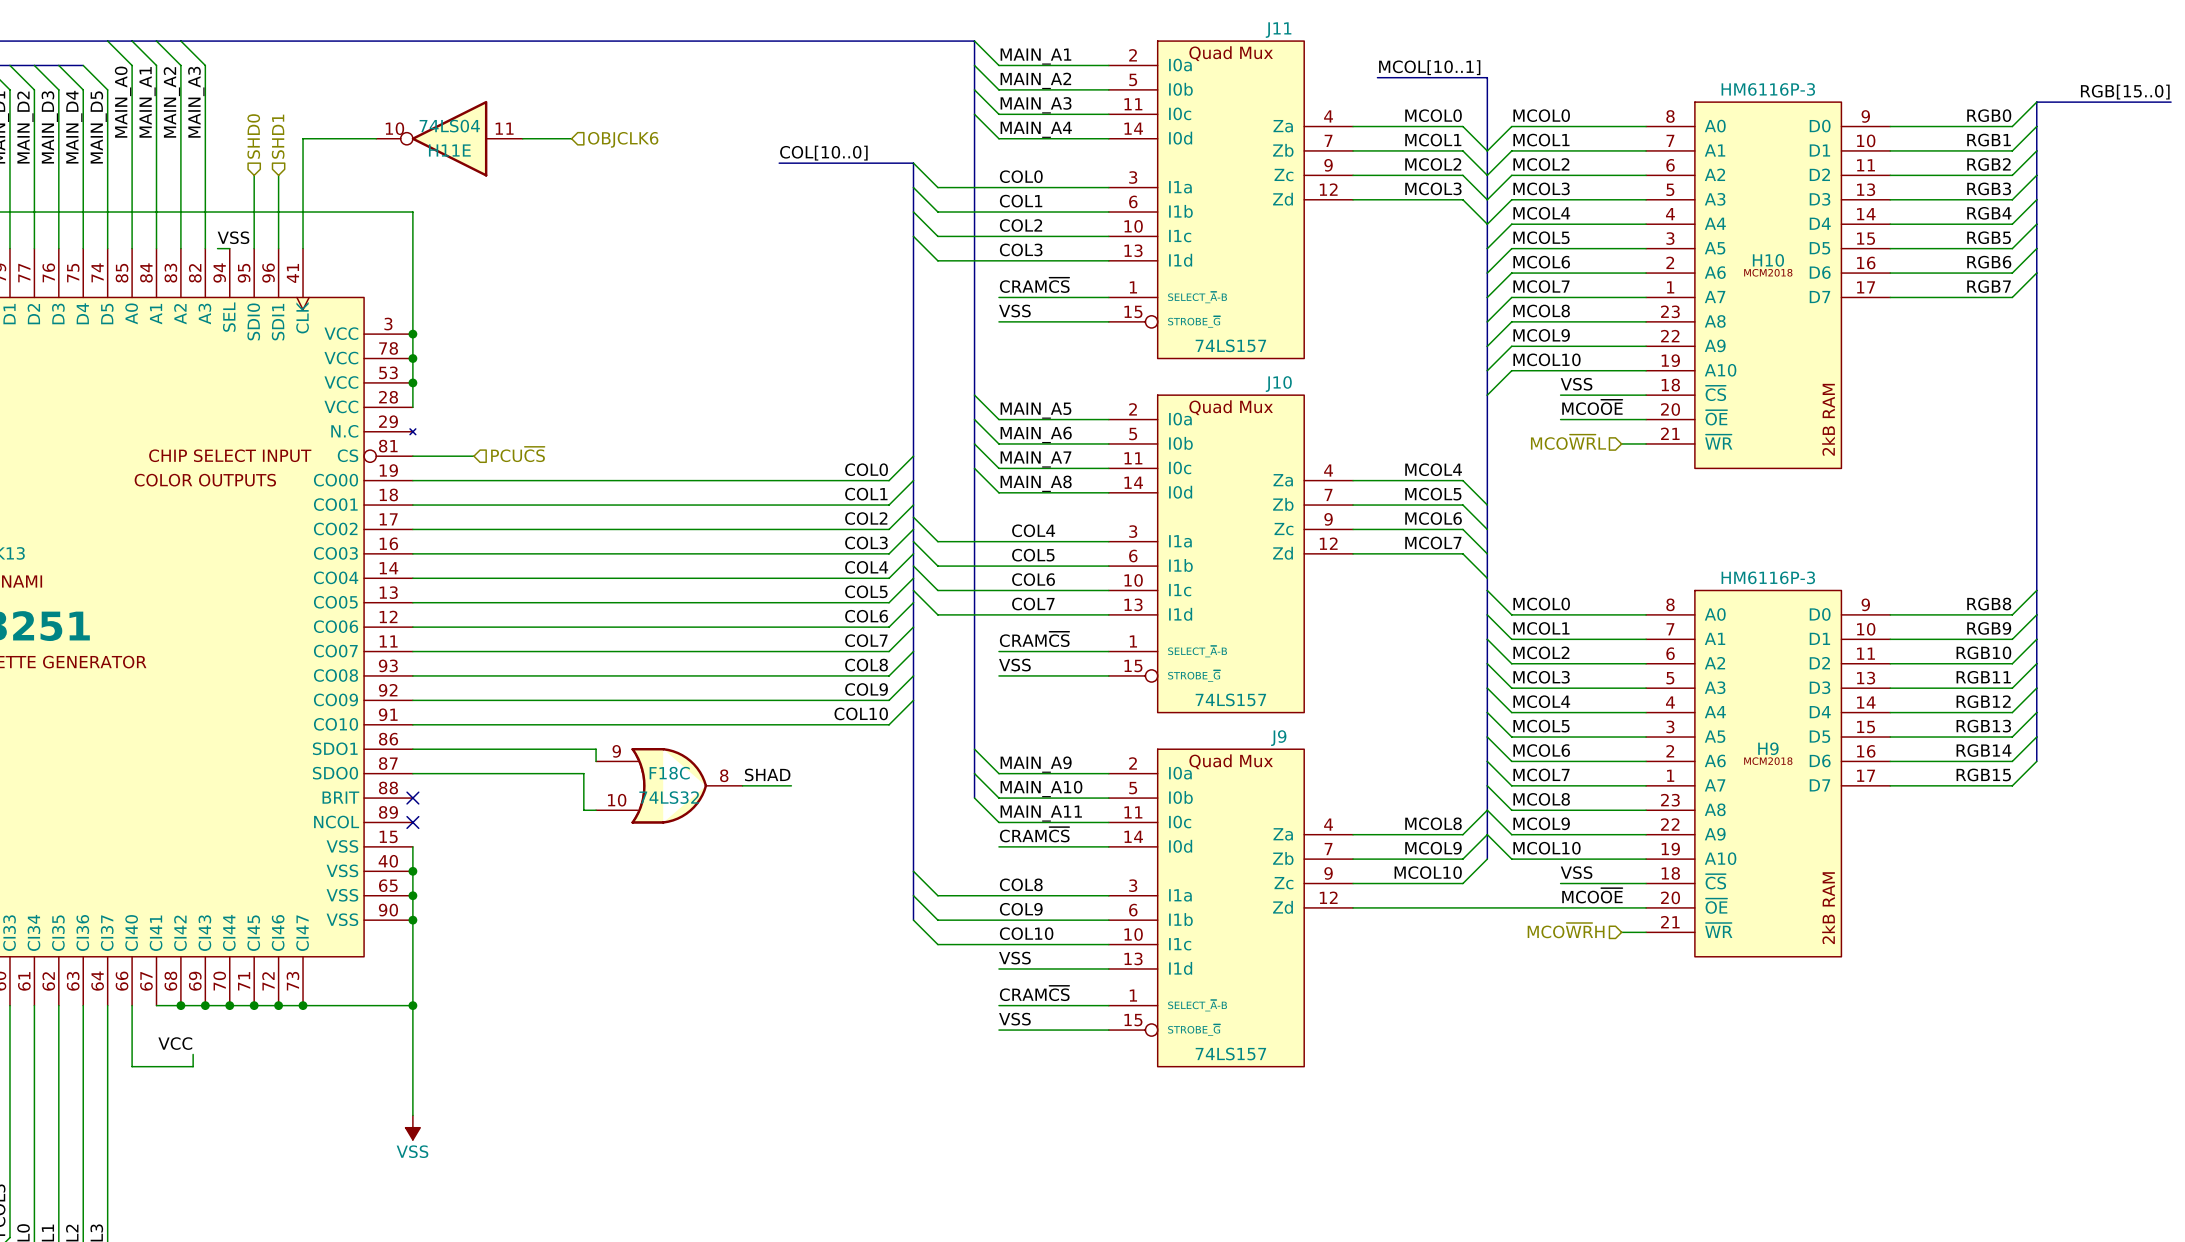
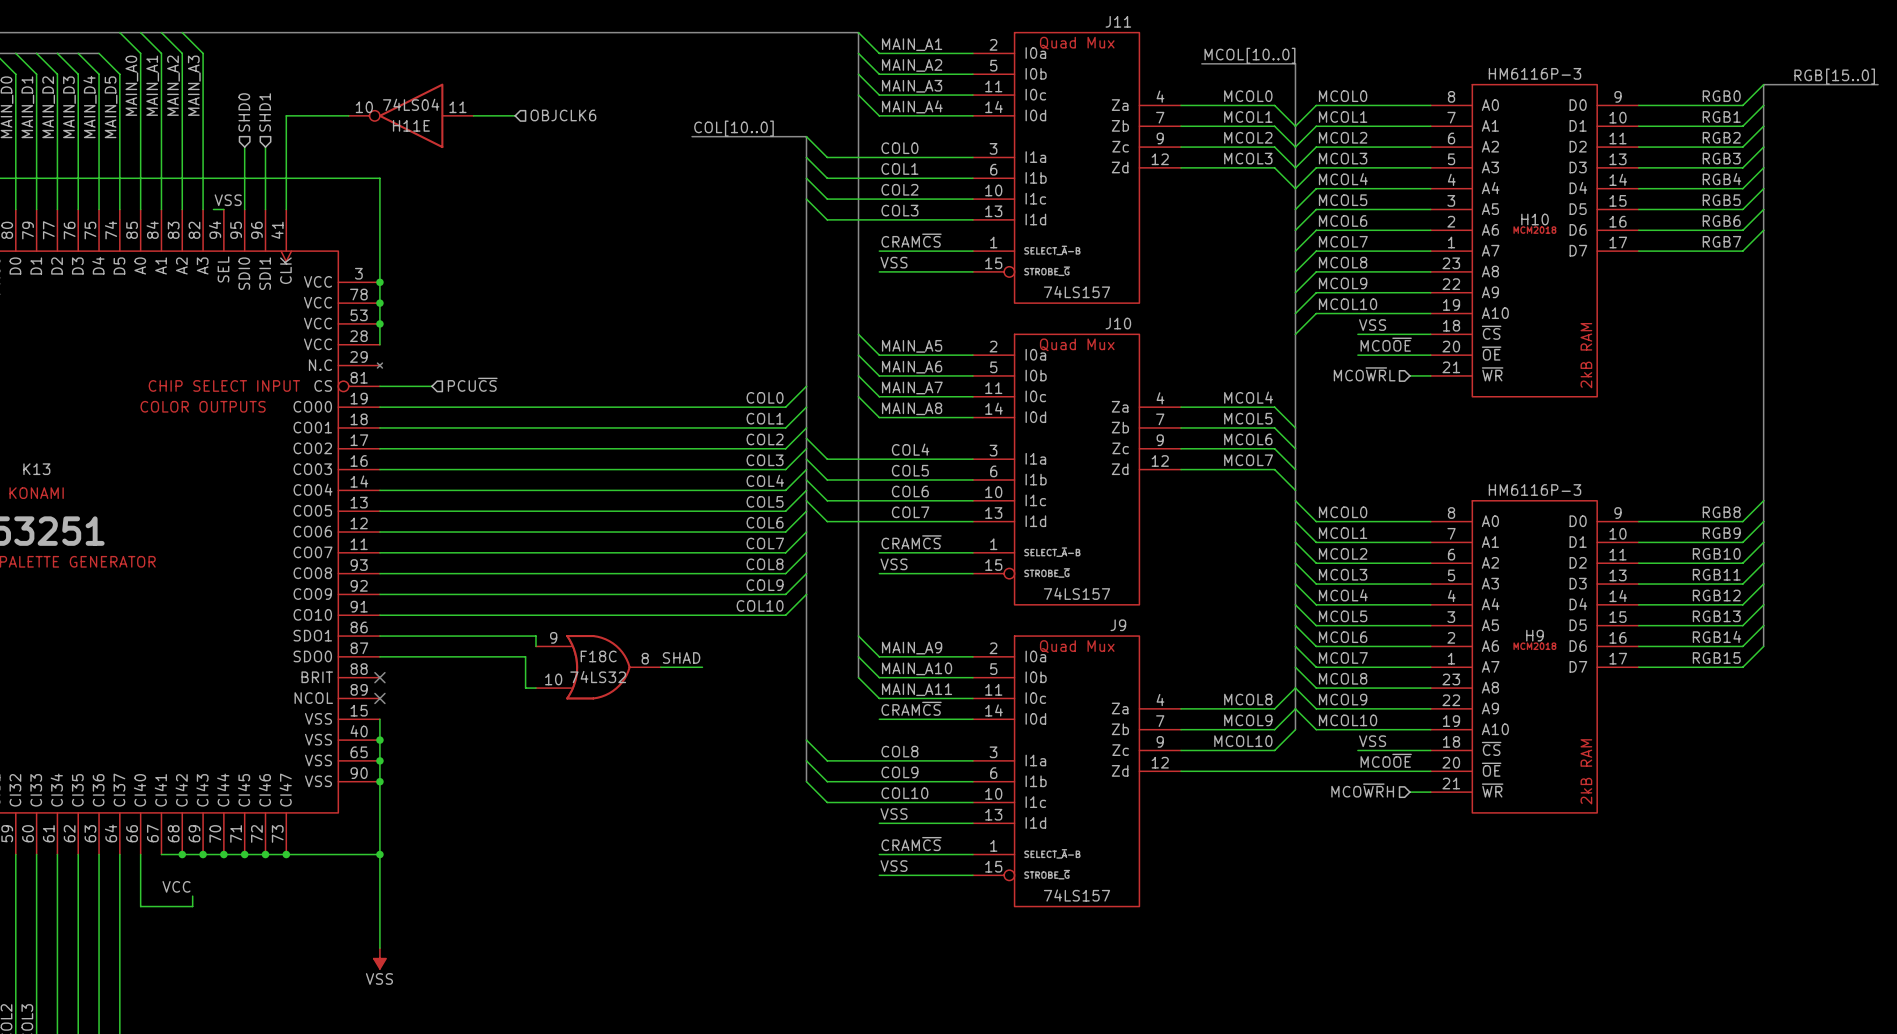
label: MCOL[10..1] (1429, 67) -> MCOL[10..0] (1249, 55)

